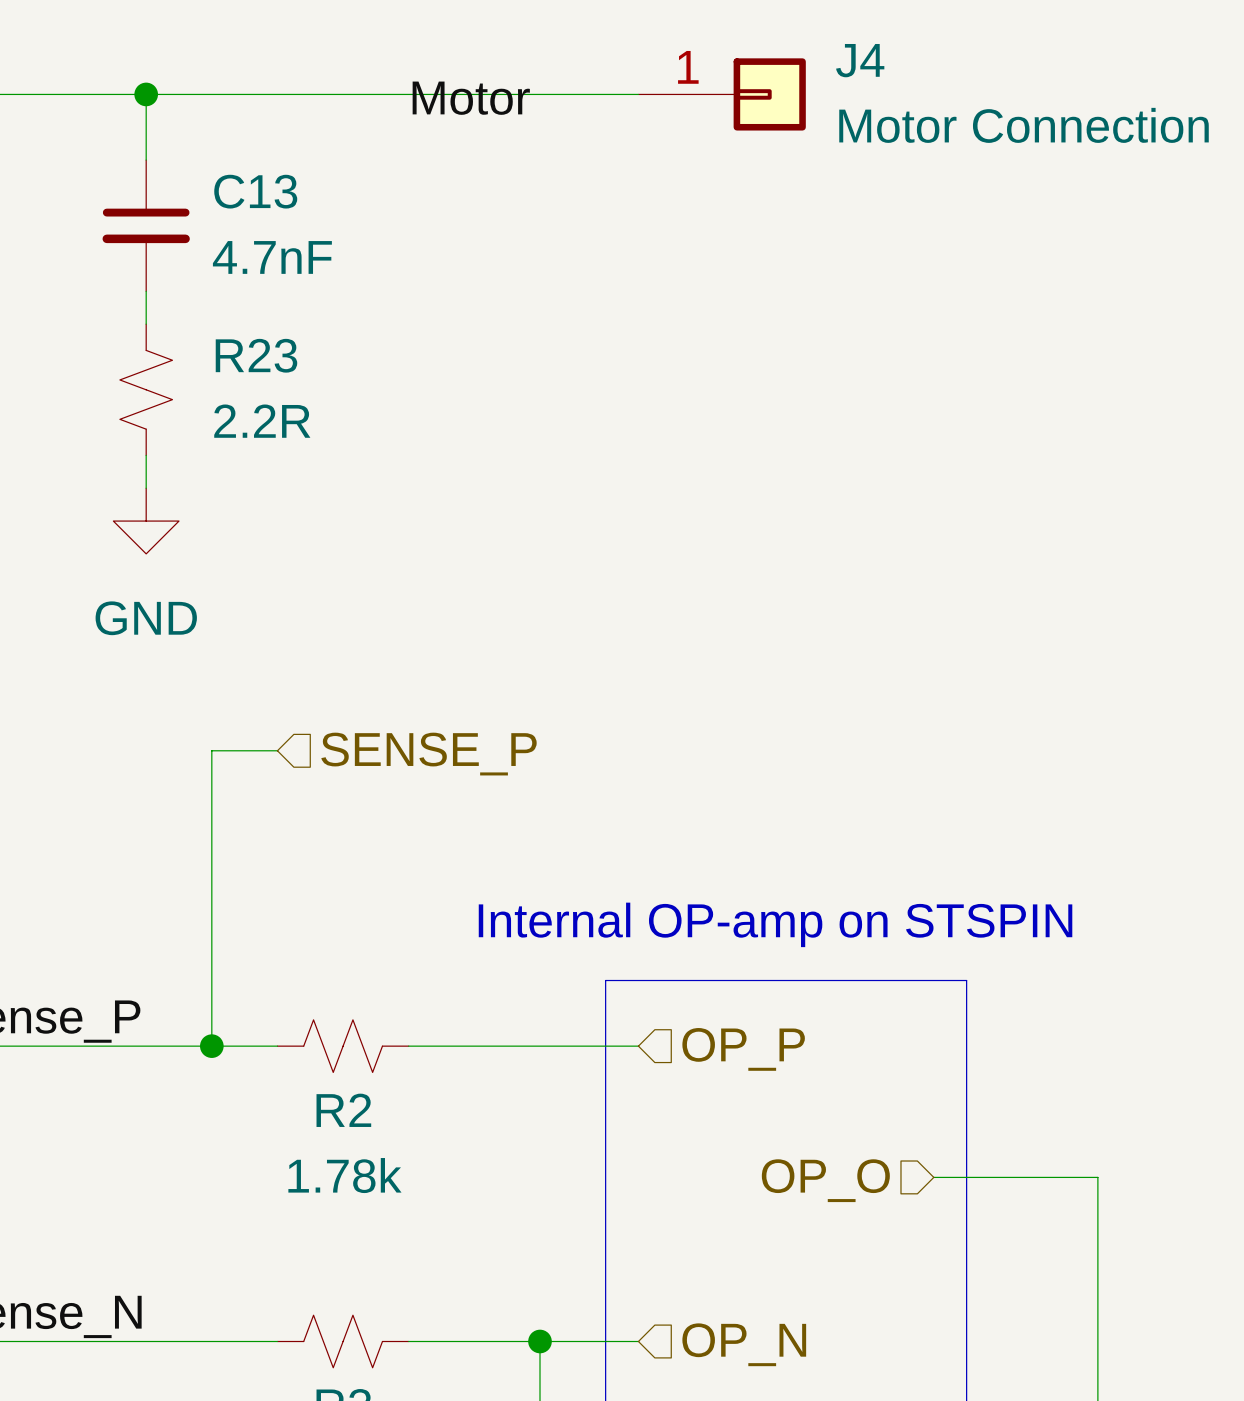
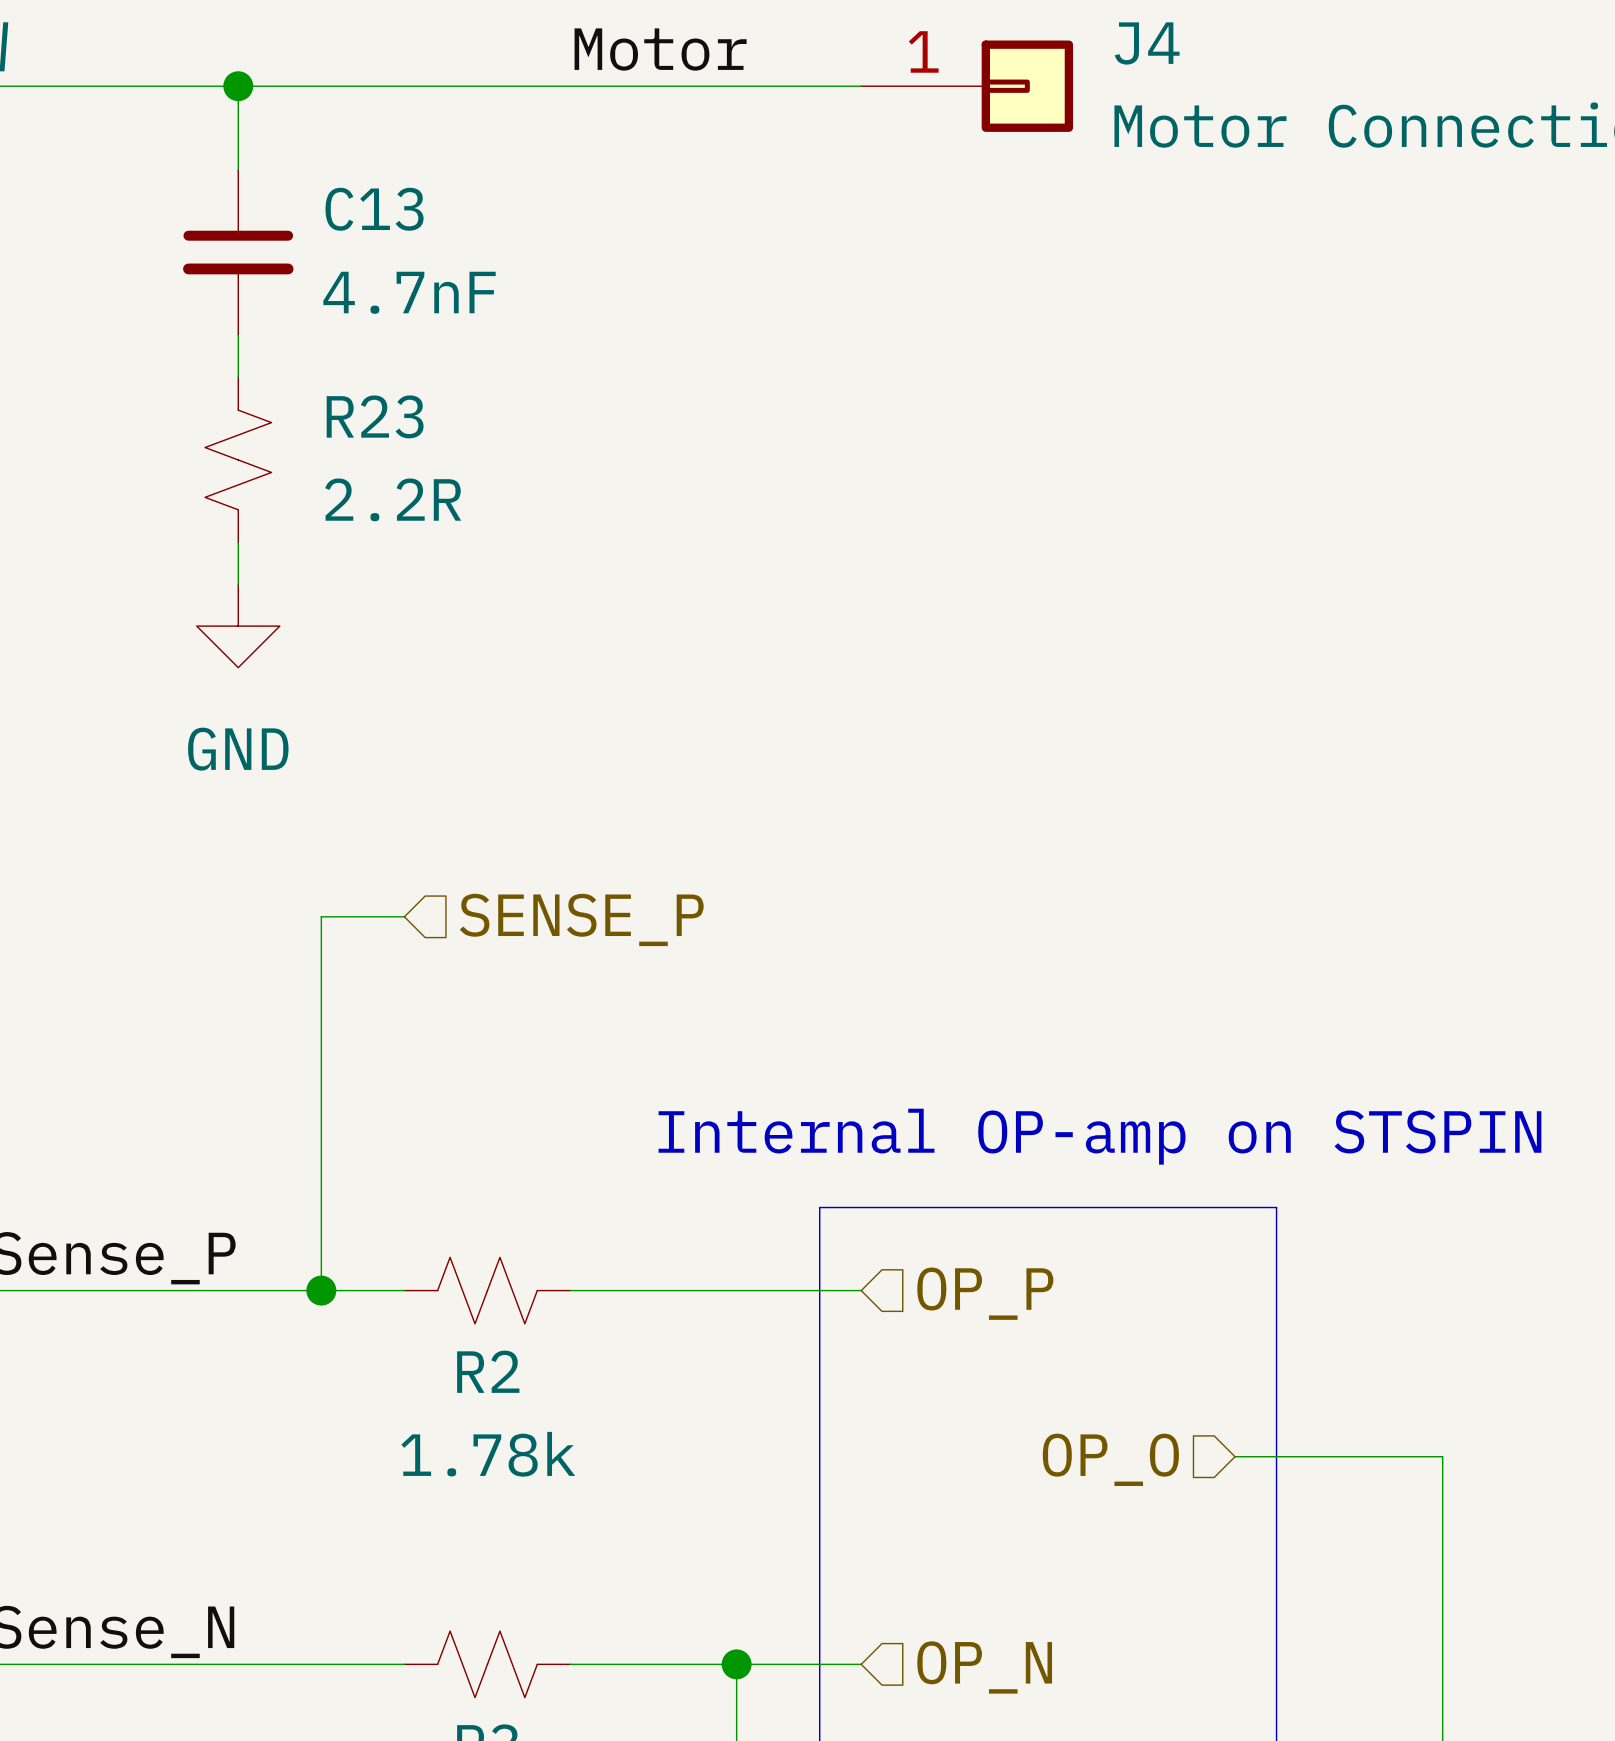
label position: Motor (471, 98) -> Motor (660, 49)

